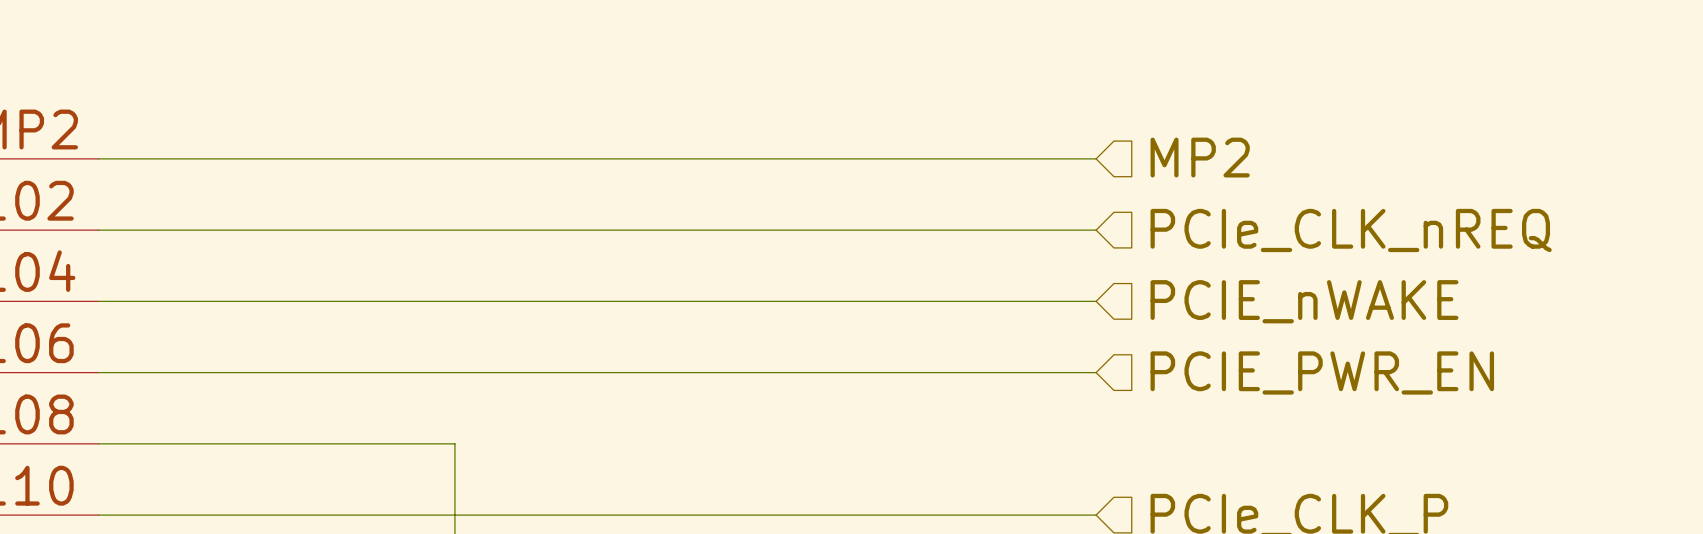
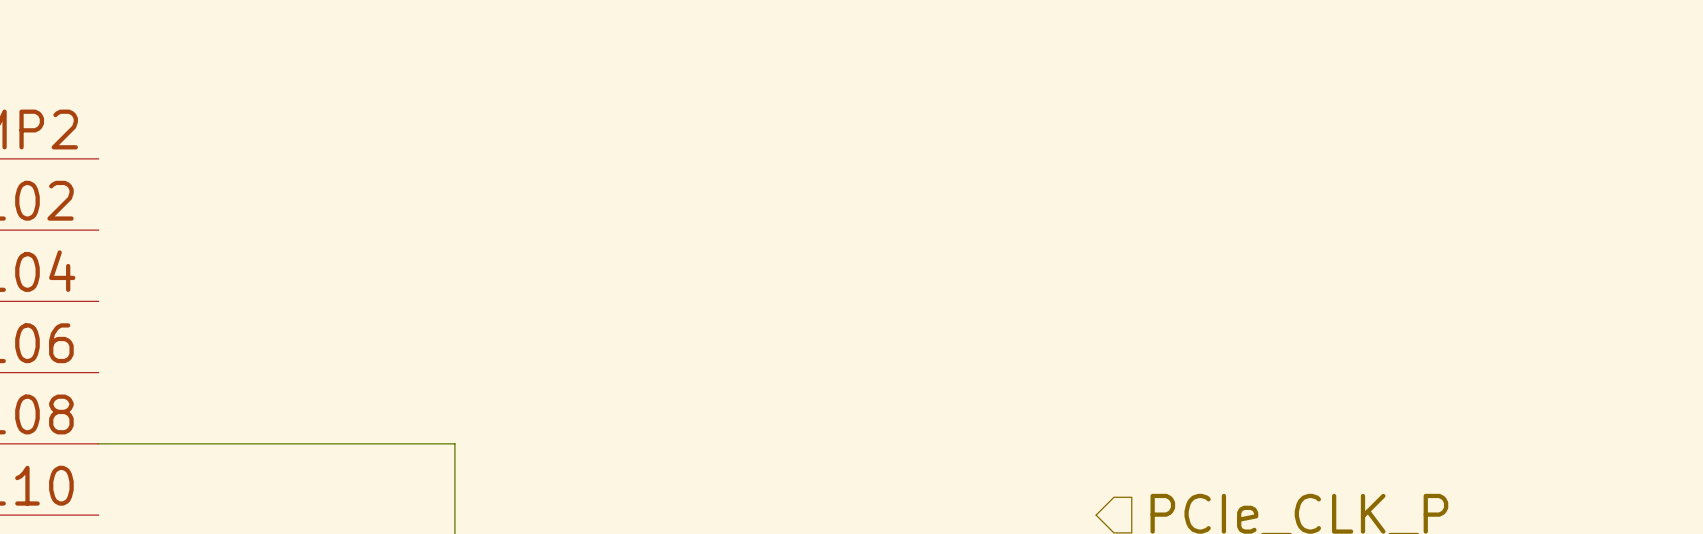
hierarchical label: MP2 (1200, 157) -> none
wire: (98, 158) (1096, 158) -> none
wire: (98, 230) (1096, 230) -> none
hierarchical label: PCIe_CLK_nREQ (1351, 230) -> none
wire: (98, 301) (1096, 301) -> none
hierarchical label: PCIE_nWAKE (1304, 301) -> none
wire: (98, 372) (1096, 372) -> none
hierarchical label: PCIE_PWR_EN (1322, 372) -> none
wire: (98, 515) (1096, 515) -> none

